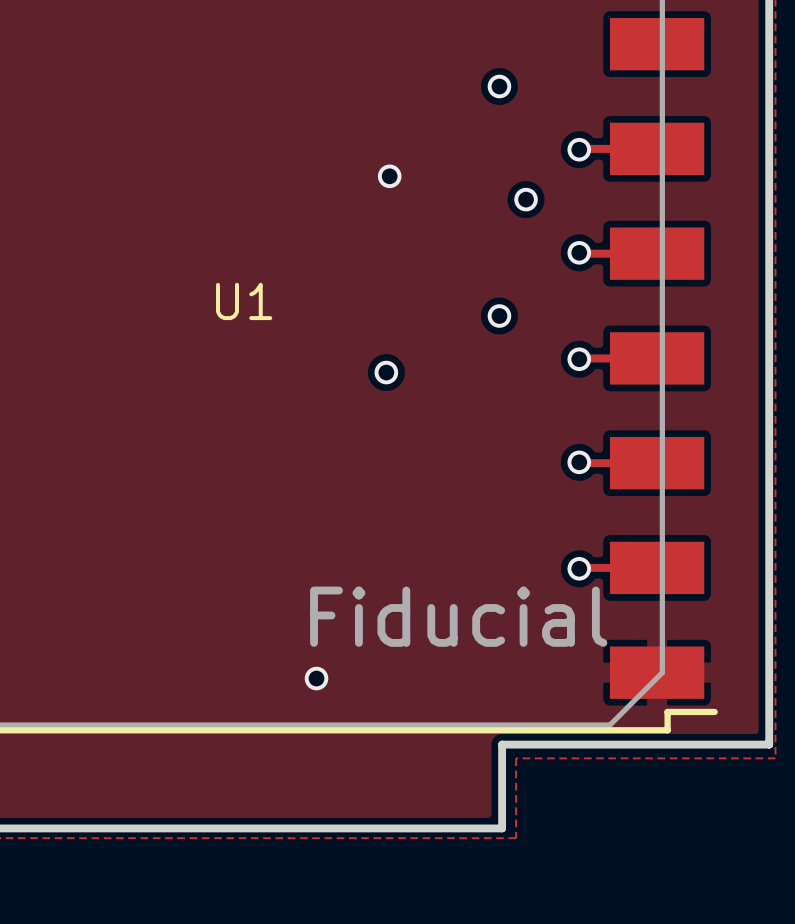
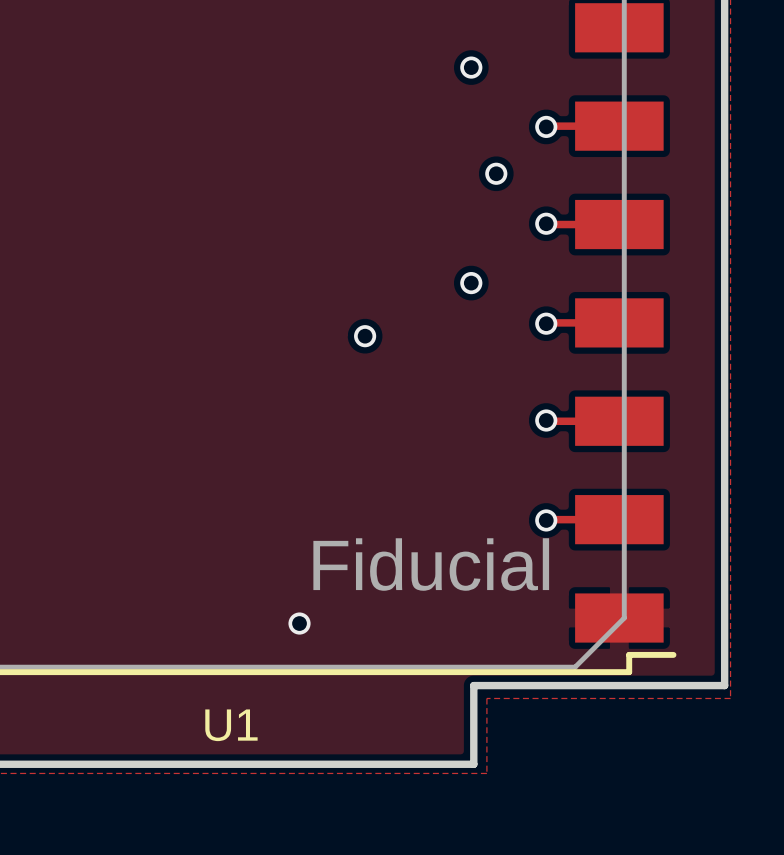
via: (389, 176) -> none
U1 name position: U1 (244, 301) -> U1 (231, 725)

